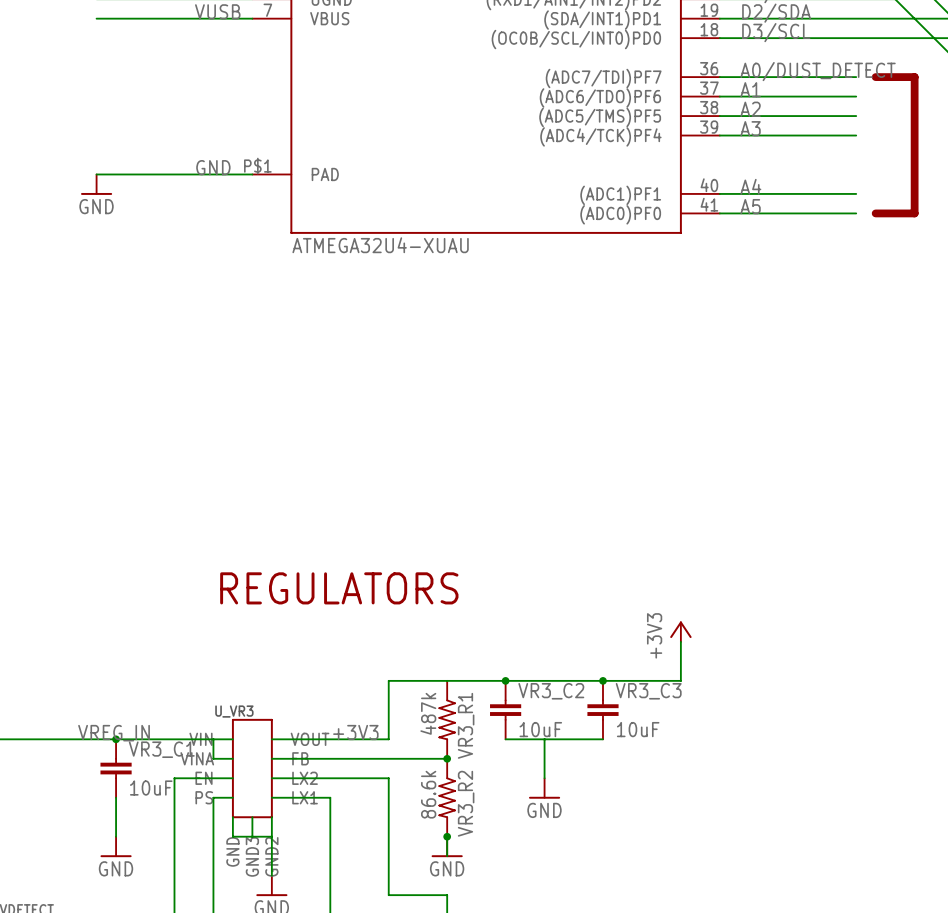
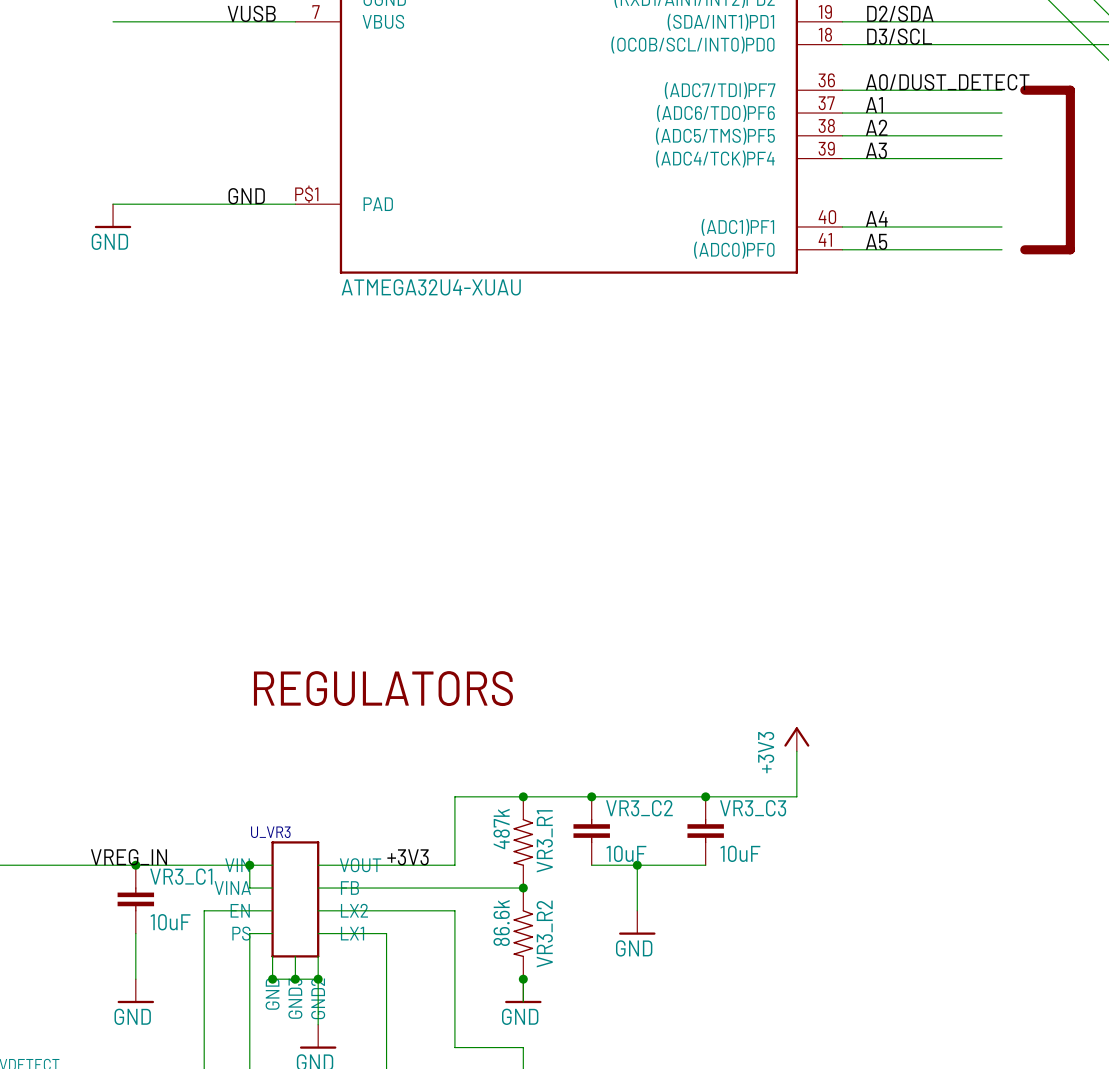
junction: none -> (523, 796)
junction: none -> (249, 865)
junction: none -> (637, 865)
junction: none -> (272, 979)
junction: none -> (295, 979)
junction: none -> (318, 979)

